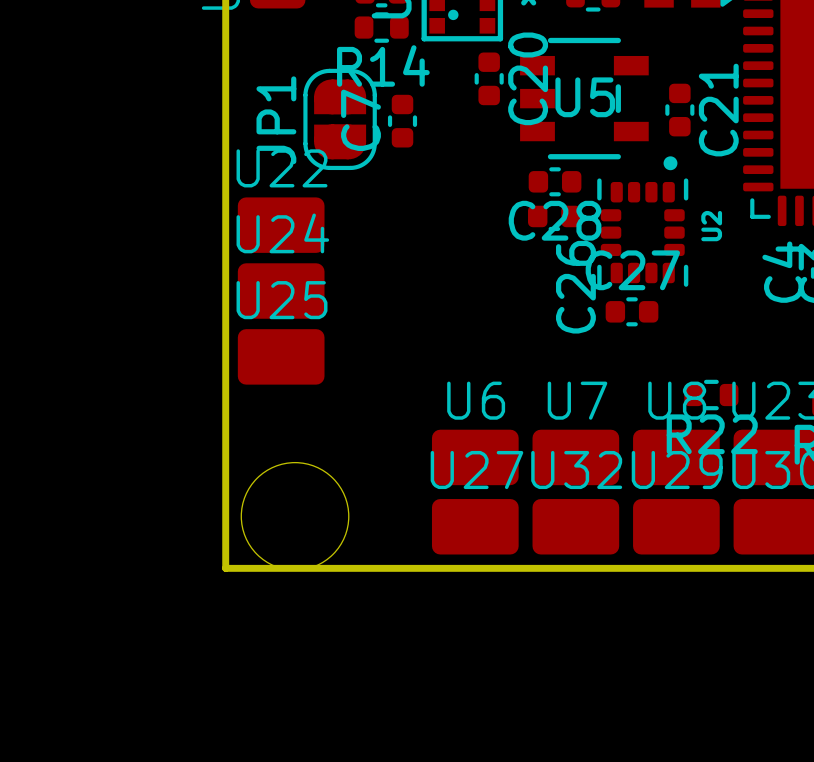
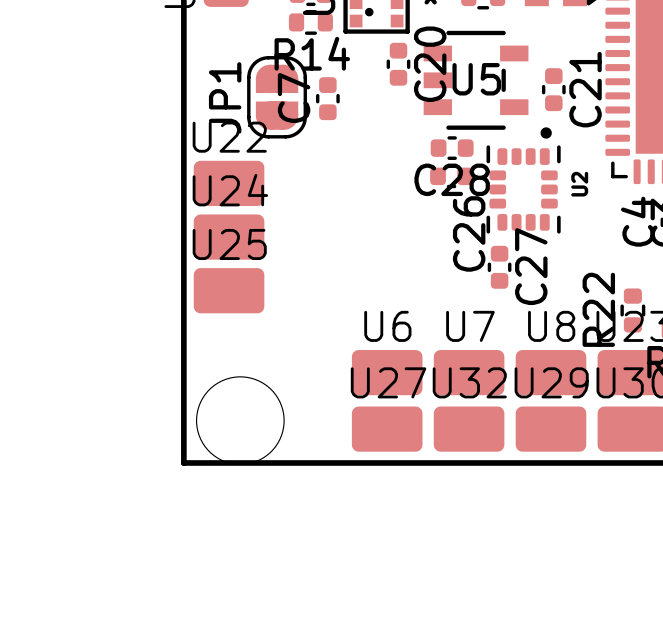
C27 rotation: 0° (632, 311) -> 90° clockwise (499, 267)
R22 rotation: 0° (711, 395) -> 90° clockwise (632, 310)
R22 position: (711, 395) -> (632, 310)

